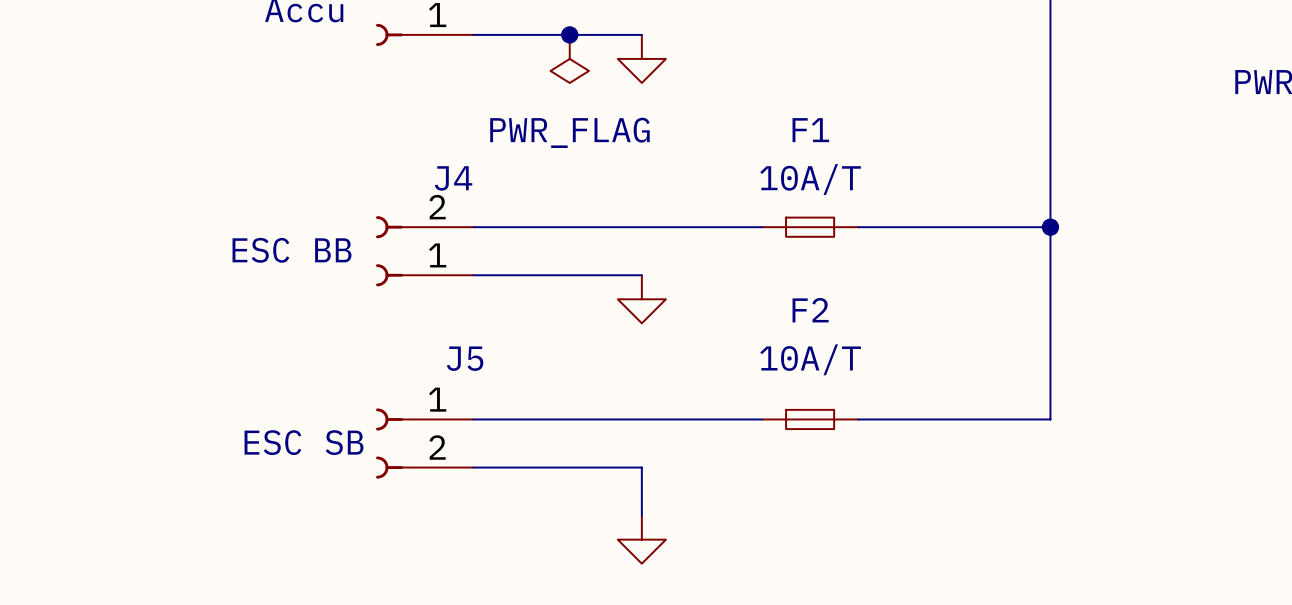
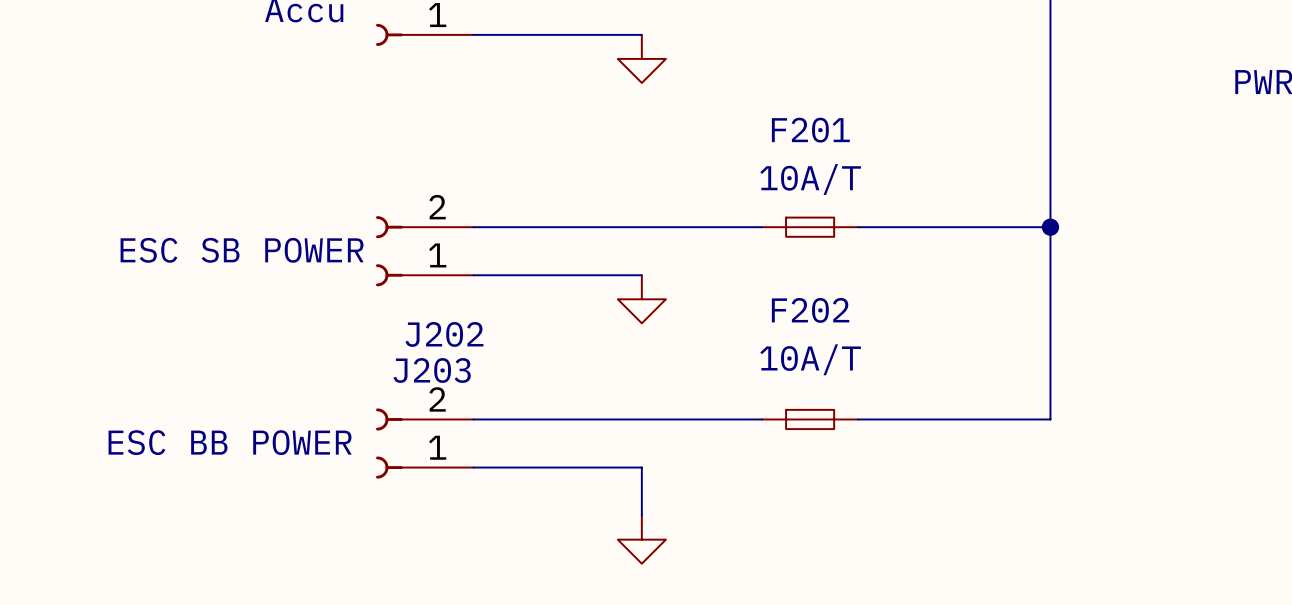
junction: (569, 34) -> none
power symbol: PWR_FLAG (569, 58) -> none
F1 name: F1 (810, 130) -> F201 (810, 130)
J4 name: J4 (453, 178) -> J202 (444, 334)
J4 value: ESC BB (292, 250) -> ESC SB POWER (242, 250)
F2 name: F2 (810, 310) -> F202 (810, 310)
J5 name: J5 (465, 358) -> J203 (432, 370)
J5 value: ESC SB (304, 442) -> ESC BB POWER (230, 442)
J5 flip: as is (389, 443) -> up-down (389, 443)

